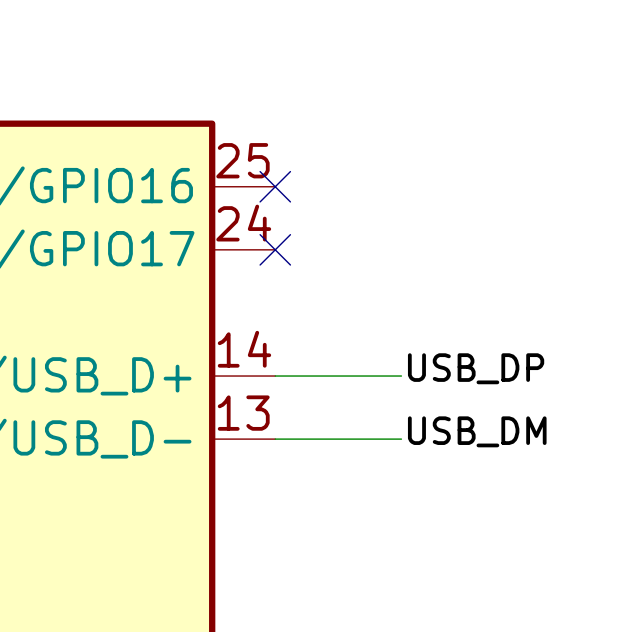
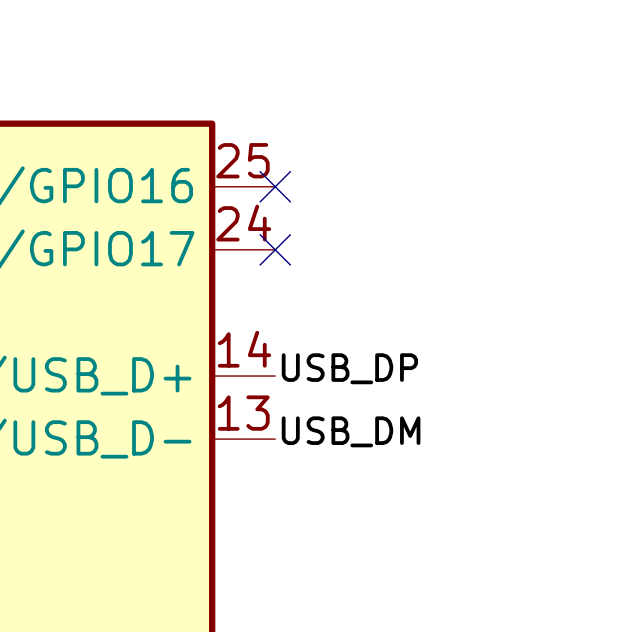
label position: USB_DP (476, 368) -> USB_DP (349, 368)
wire: (275, 376) (401, 376) -> none
label position: USB_DM (477, 431) -> USB_DM (351, 431)
wire: (275, 439) (401, 439) -> none

